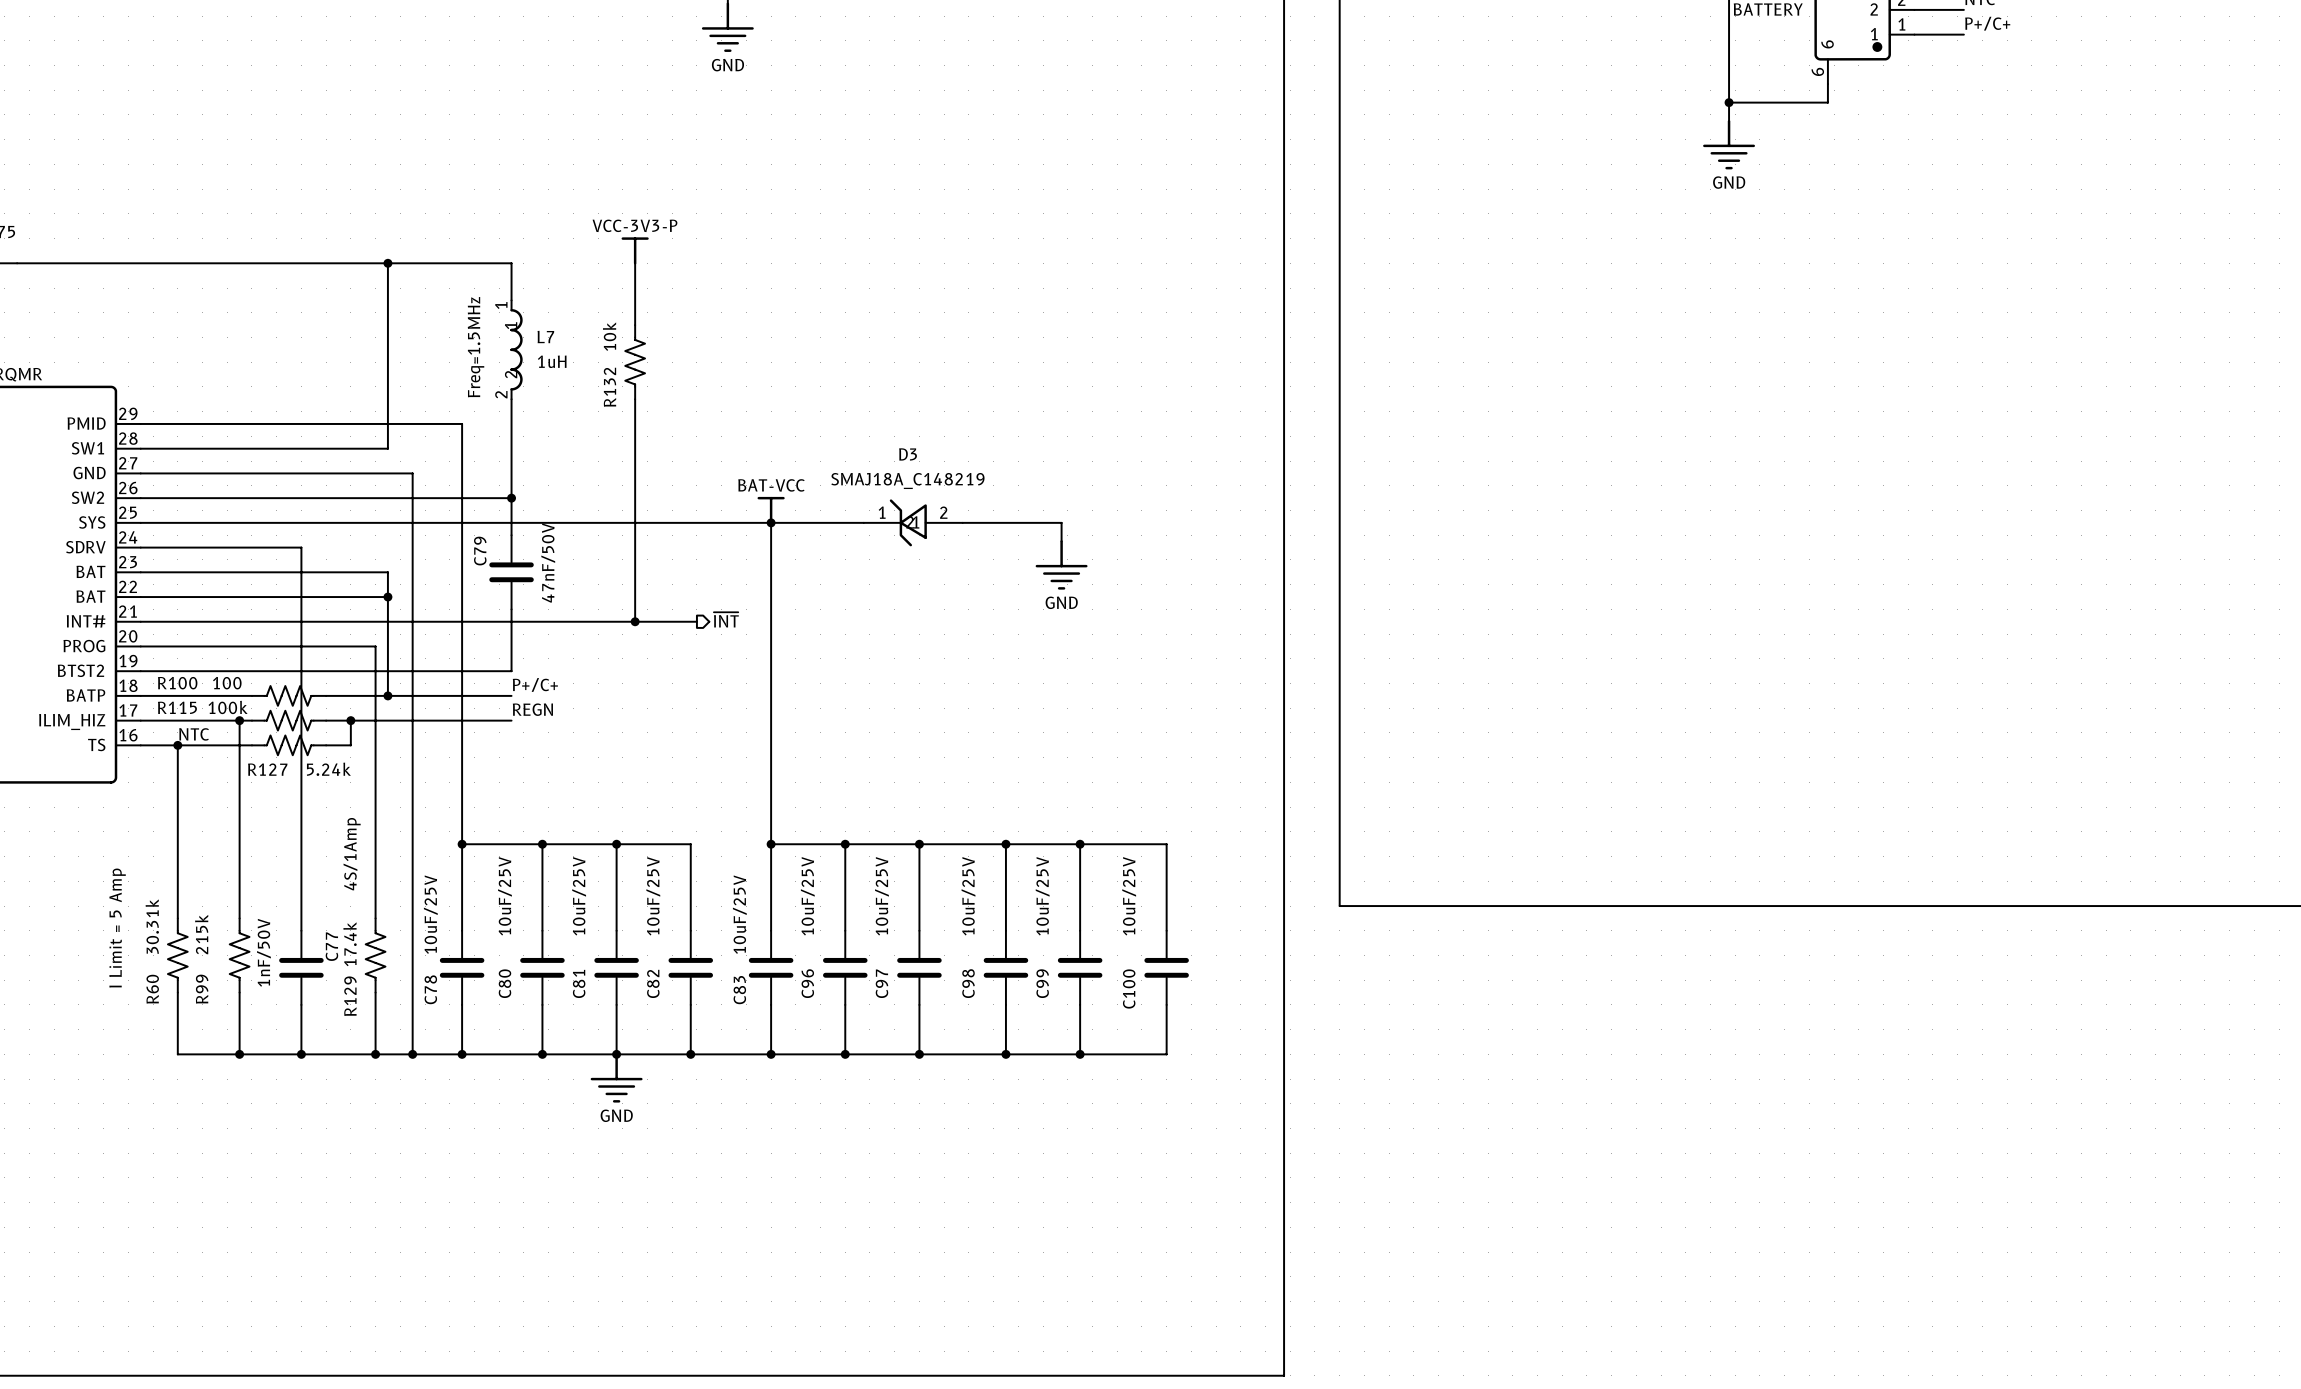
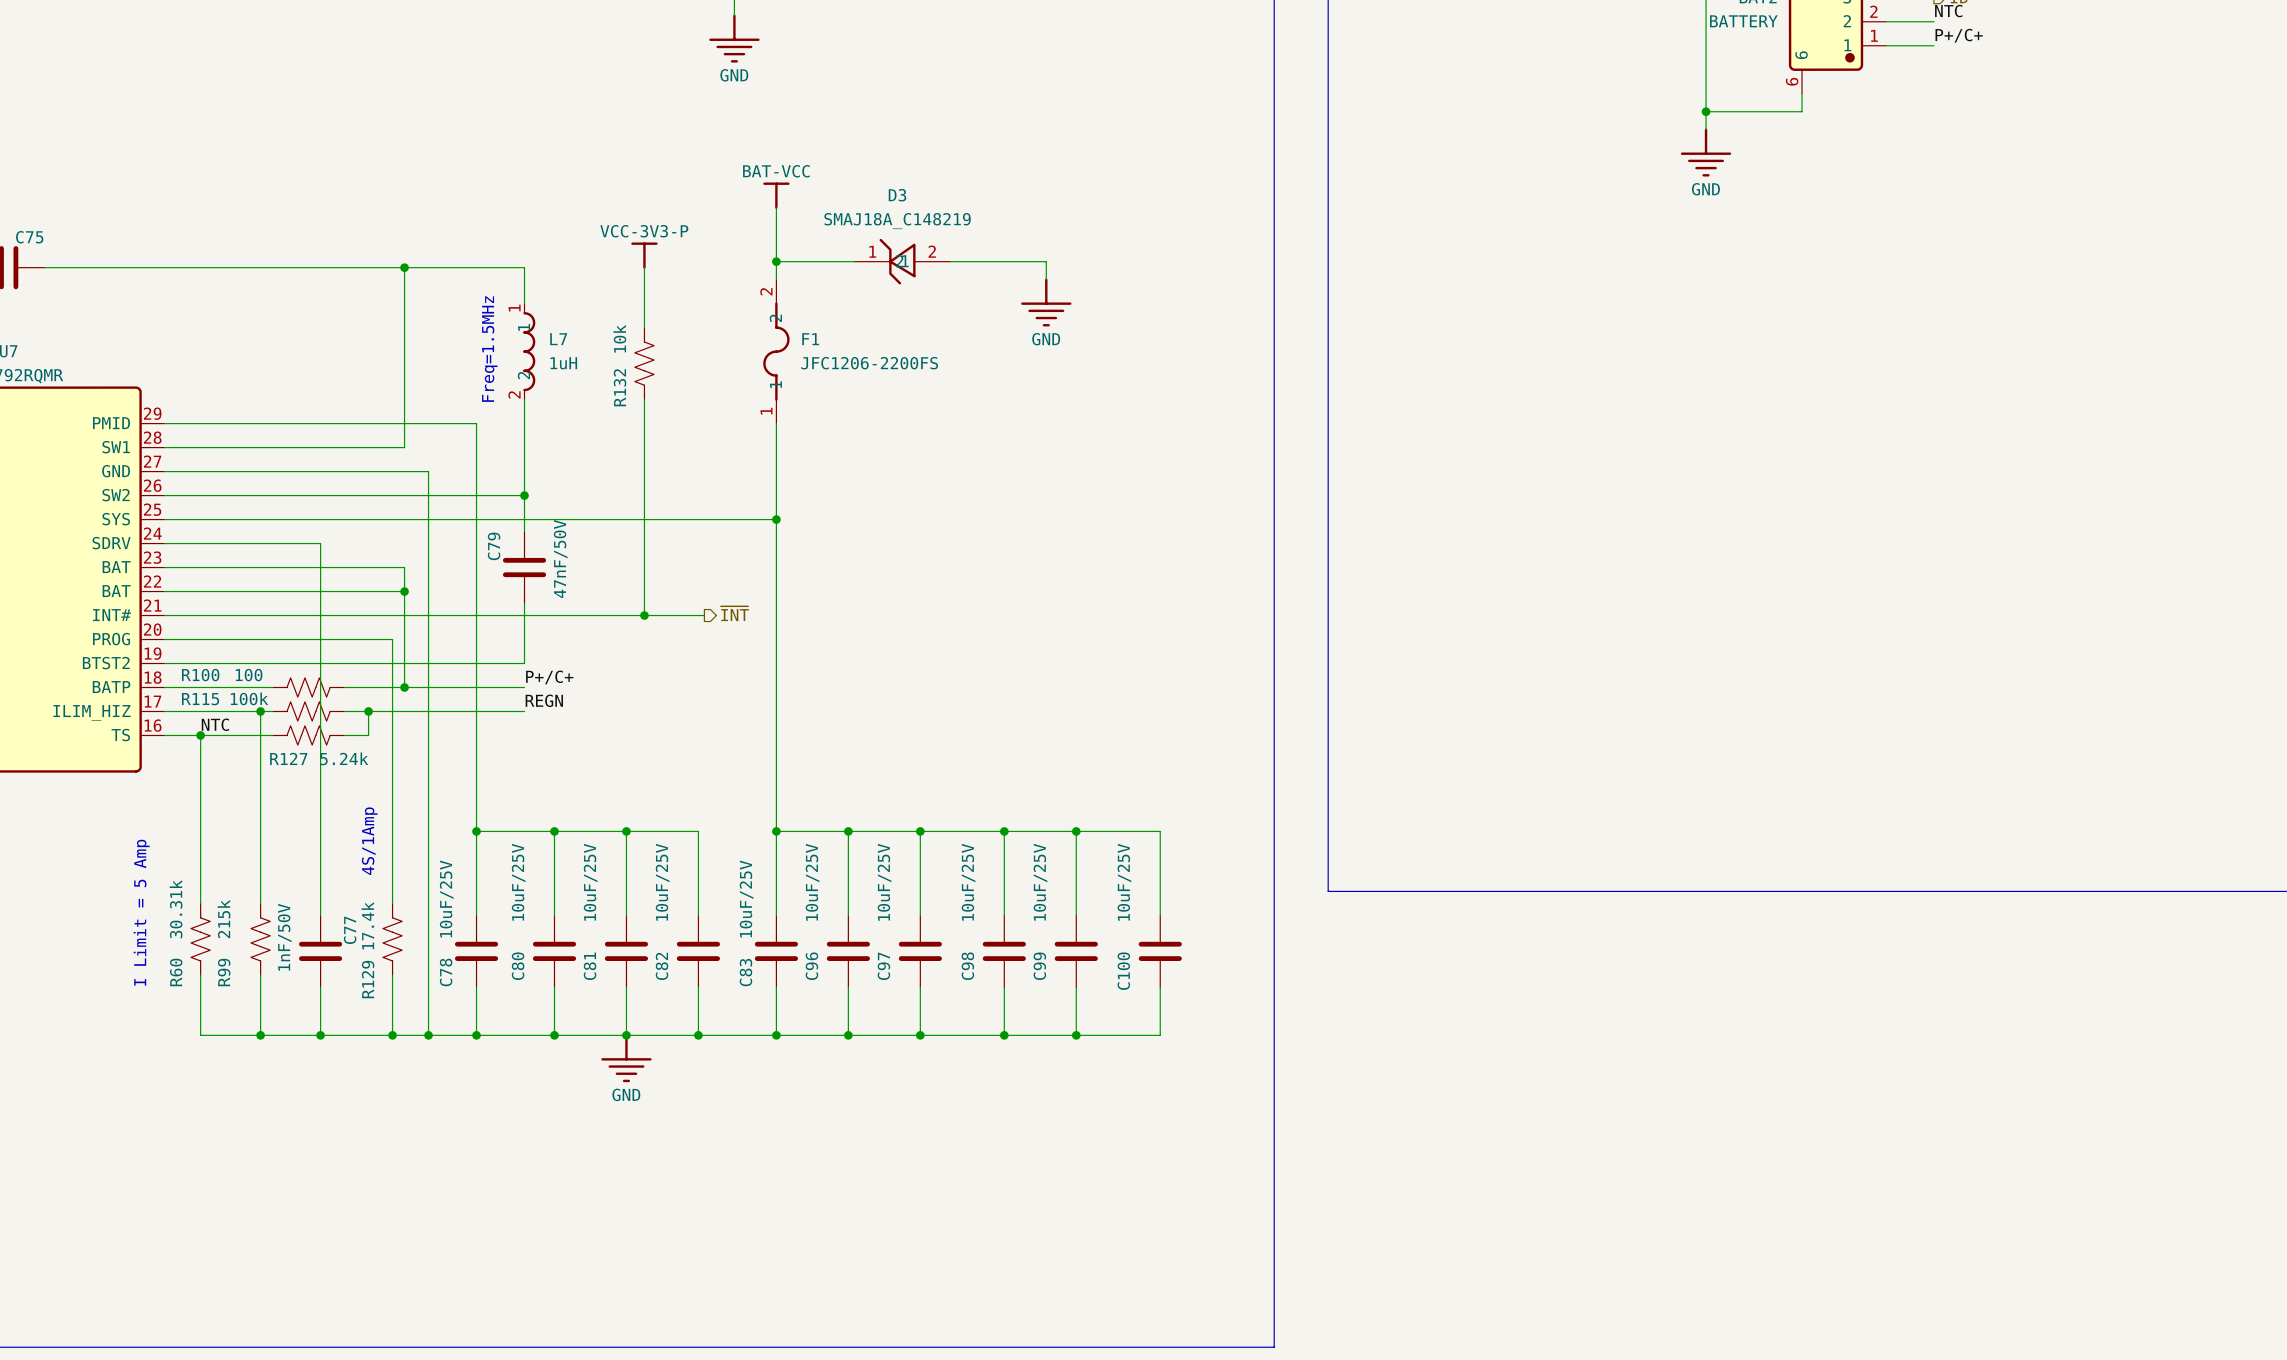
power symbol: none -> BAT-VCC (776, 195)
wire: none -> (776, 207) (776, 279)
wire: none -> (776, 261) (854, 261)
junction: none -> (776, 261)
wire: none -> (950, 261) (1046, 261) (1046, 279)
power symbol: none -> GND (1046, 302)
F1: none -> JFC1206-2200FS (776, 351)
power symbol: BAT-VCC (771, 510) -> none
wire: (771, 522) (863, 522) -> (776, 519) (776, 423)
D3 position: (913, 522) -> (902, 261)
wire: (962, 522) (1061, 522) (1061, 541) -> none
power symbol: GND (1061, 564) -> none

